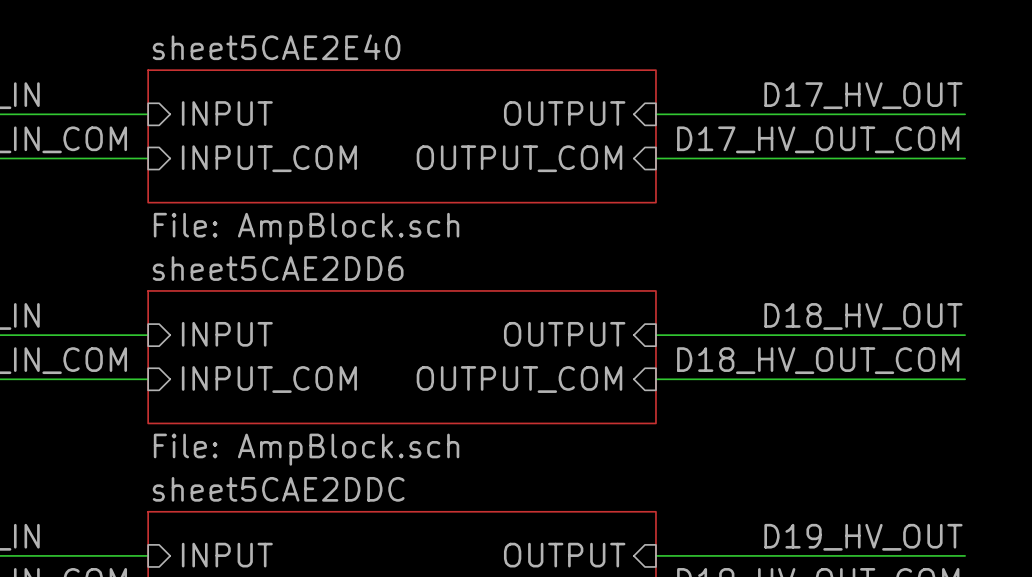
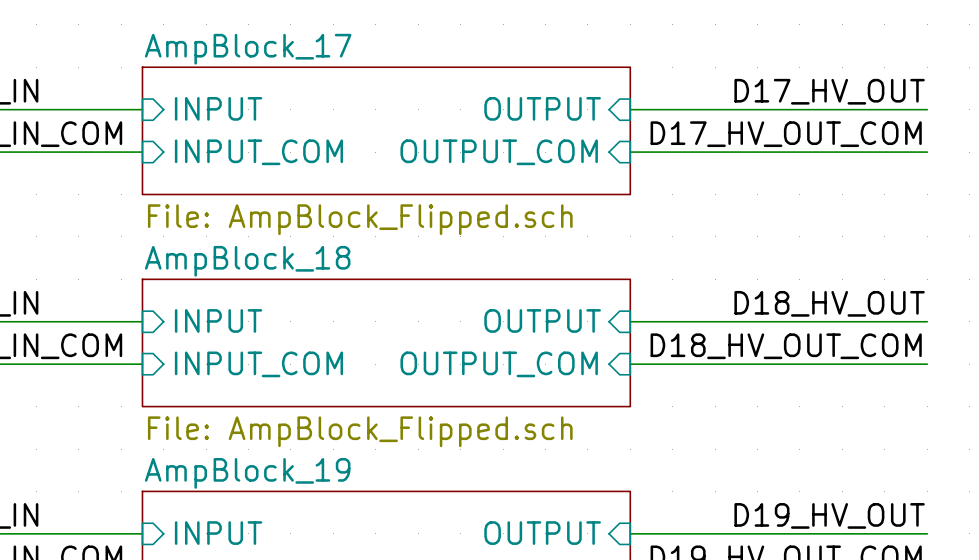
sheet sheet5CAE2E40 name: sheet5CAE2E40 (276, 47) -> AmpBlock_17 (248, 49)
sheet sheet5CAE2E40 value: File: AmpBlock.sch (306, 228) -> File: AmpBlock_Flipped.sch (360, 219)
sheet sheet5CAE2DD6 name: sheet5CAE2DD6 (278, 268) -> AmpBlock_18 (247, 261)
sheet sheet5CAE2DD6 value: File: AmpBlock.sch (306, 449) -> File: AmpBlock_Flipped.sch (360, 431)
sheet sheet5CAE2DDC name: sheet5CAE2DDC (278, 489) -> AmpBlock_19 (247, 473)

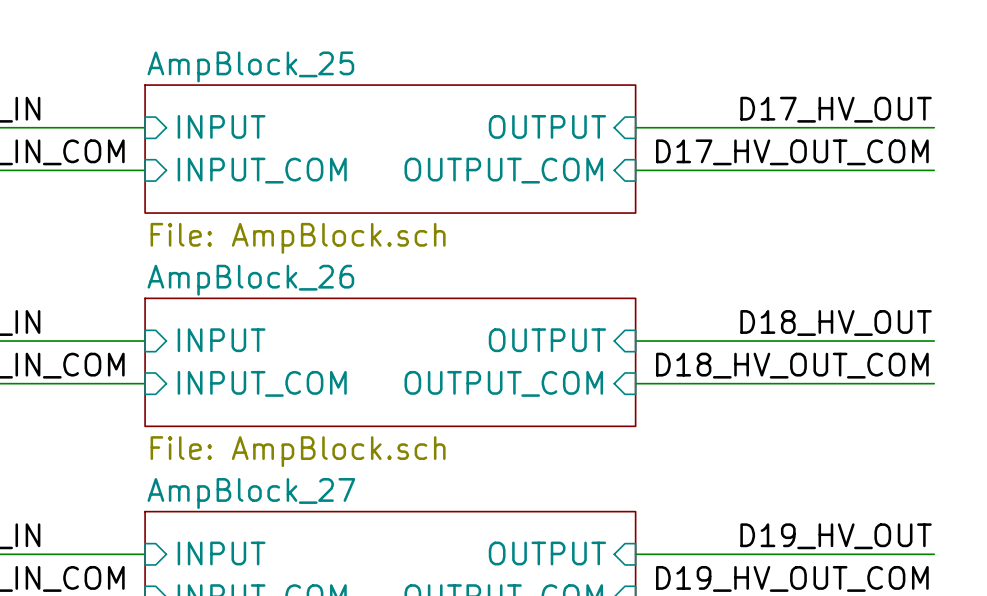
sheet AmpBlock_17 name: AmpBlock_17 (248, 49) -> AmpBlock_25 (250, 66)
sheet AmpBlock_17 value: File: AmpBlock_Flipped.sch (360, 219) -> File: AmpBlock.sch (298, 238)
sheet AmpBlock_18 name: AmpBlock_18 (247, 261) -> AmpBlock_26 (250, 280)
sheet AmpBlock_18 value: File: AmpBlock_Flipped.sch (360, 431) -> File: AmpBlock.sch (298, 451)
sheet AmpBlock_19 name: AmpBlock_19 (247, 473) -> AmpBlock_27 (251, 493)

